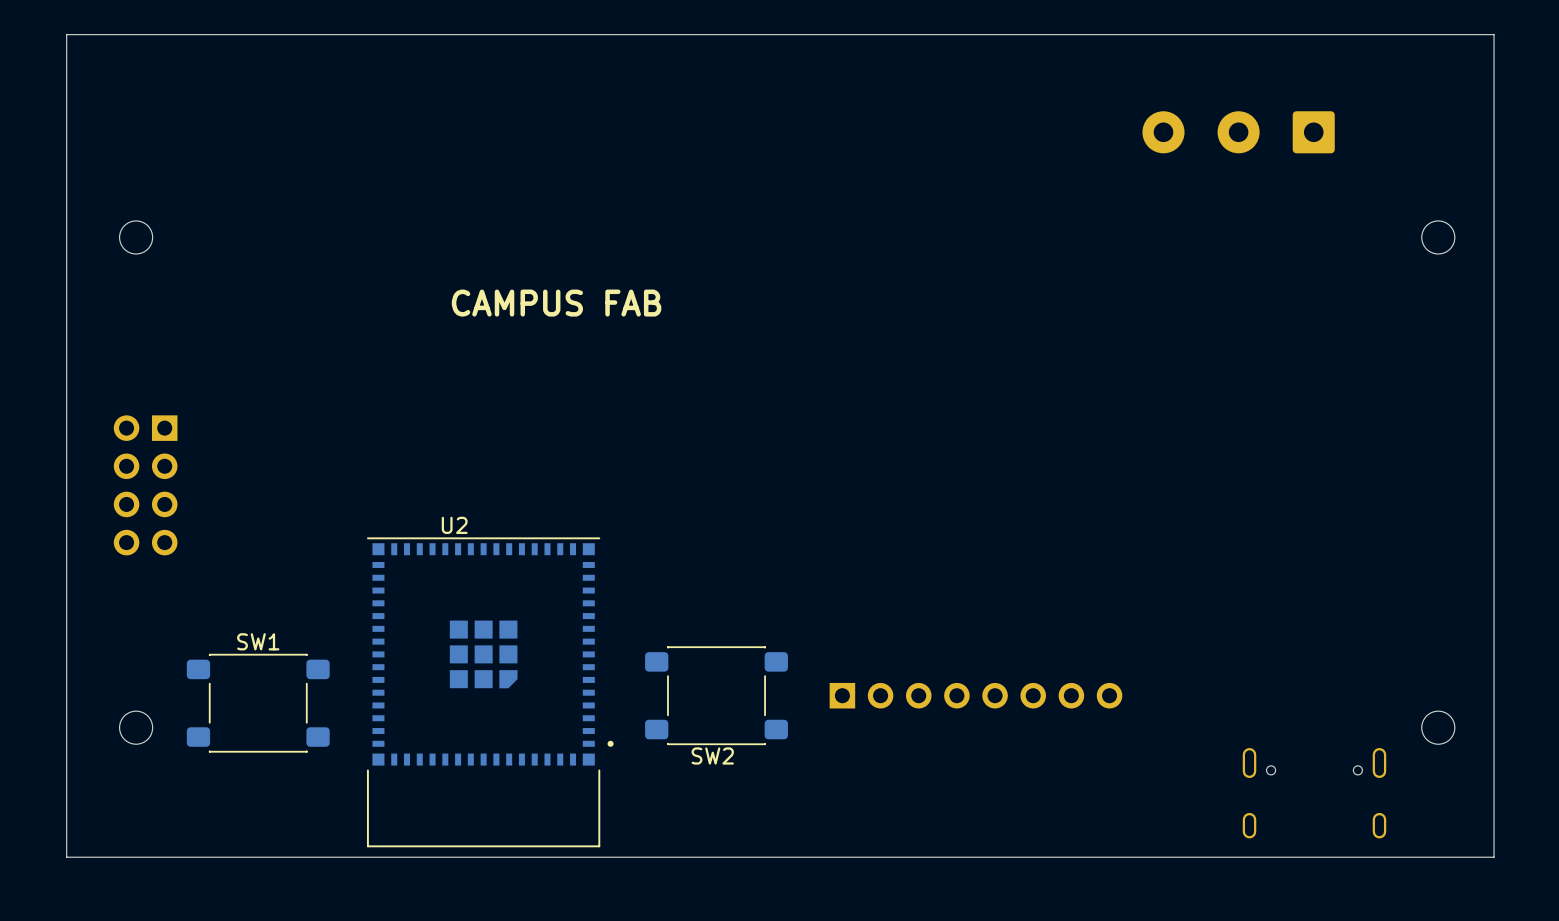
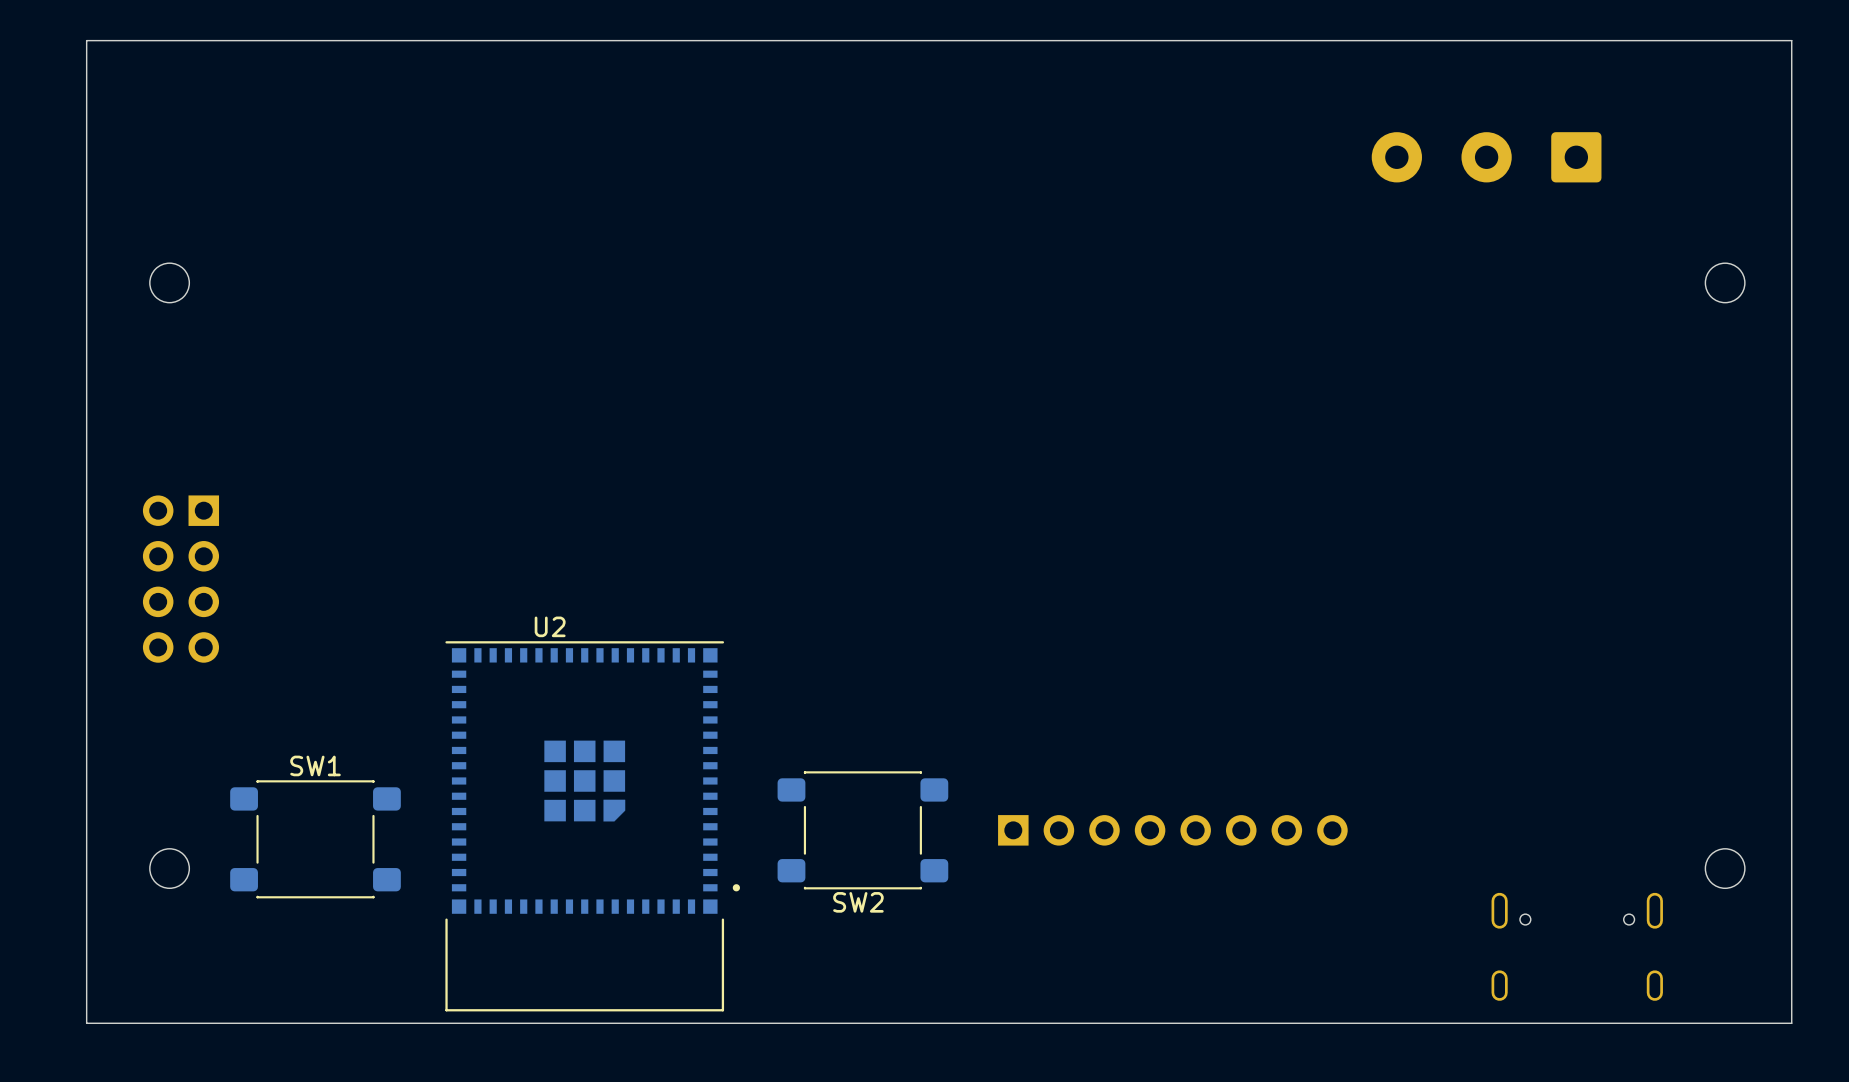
text: CAMPUS FAB (556, 303) -> none

